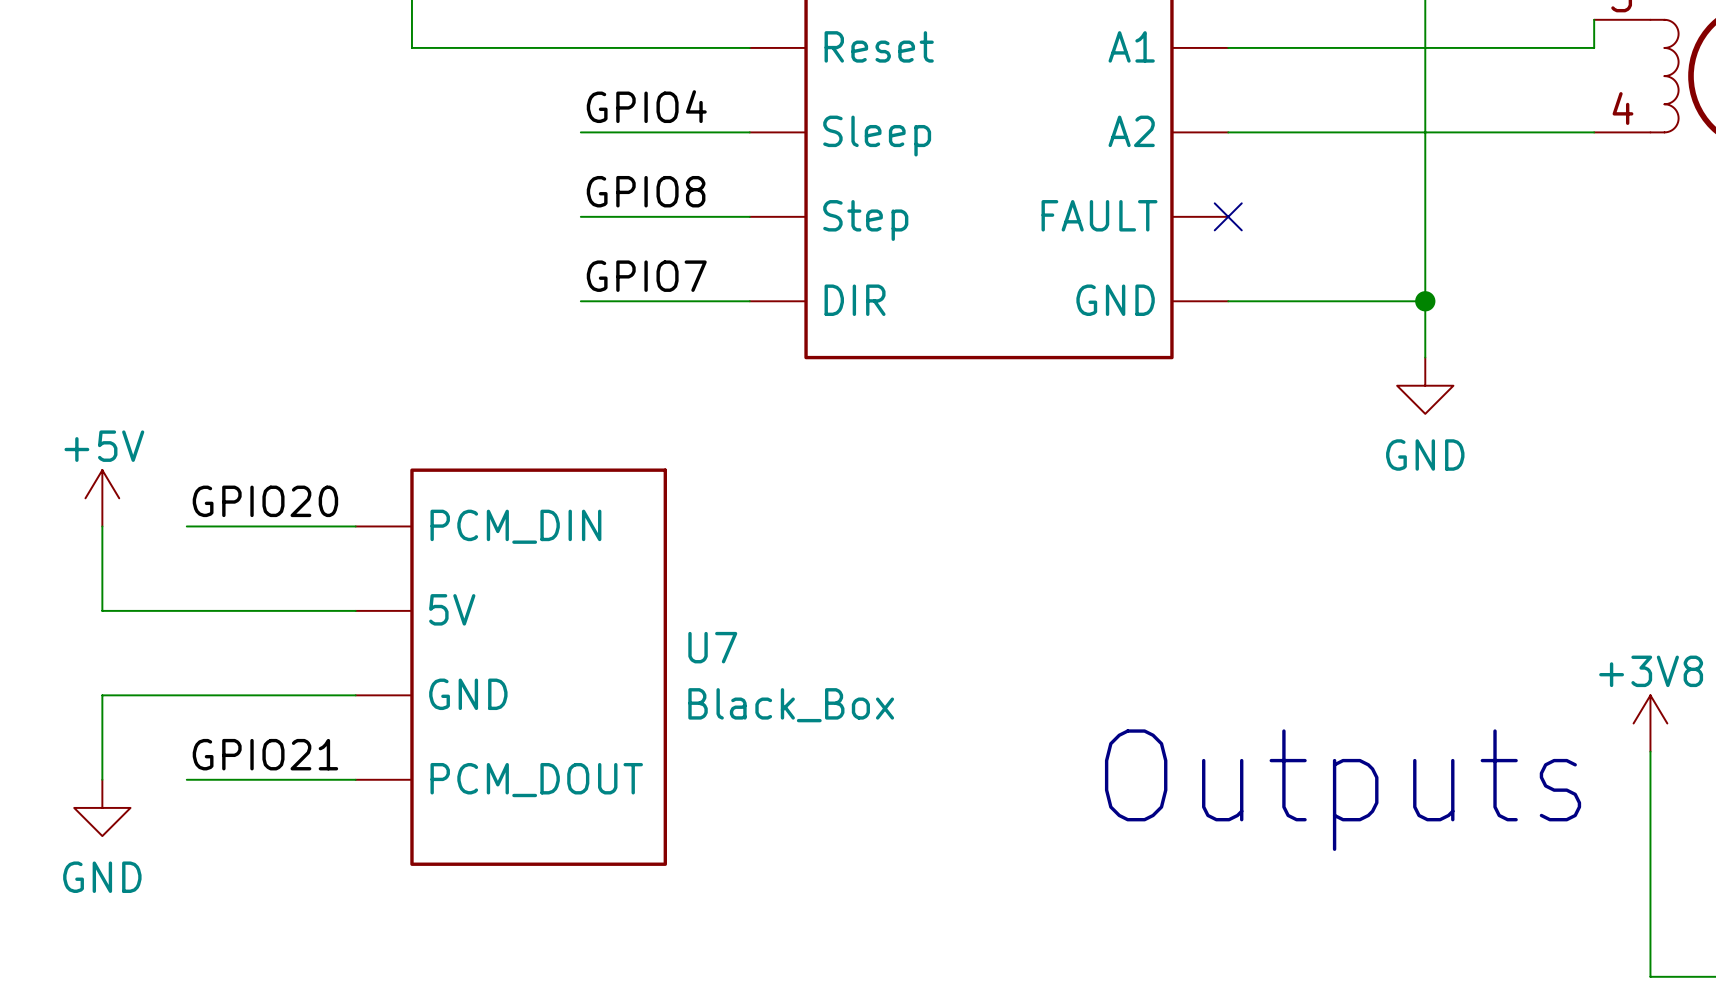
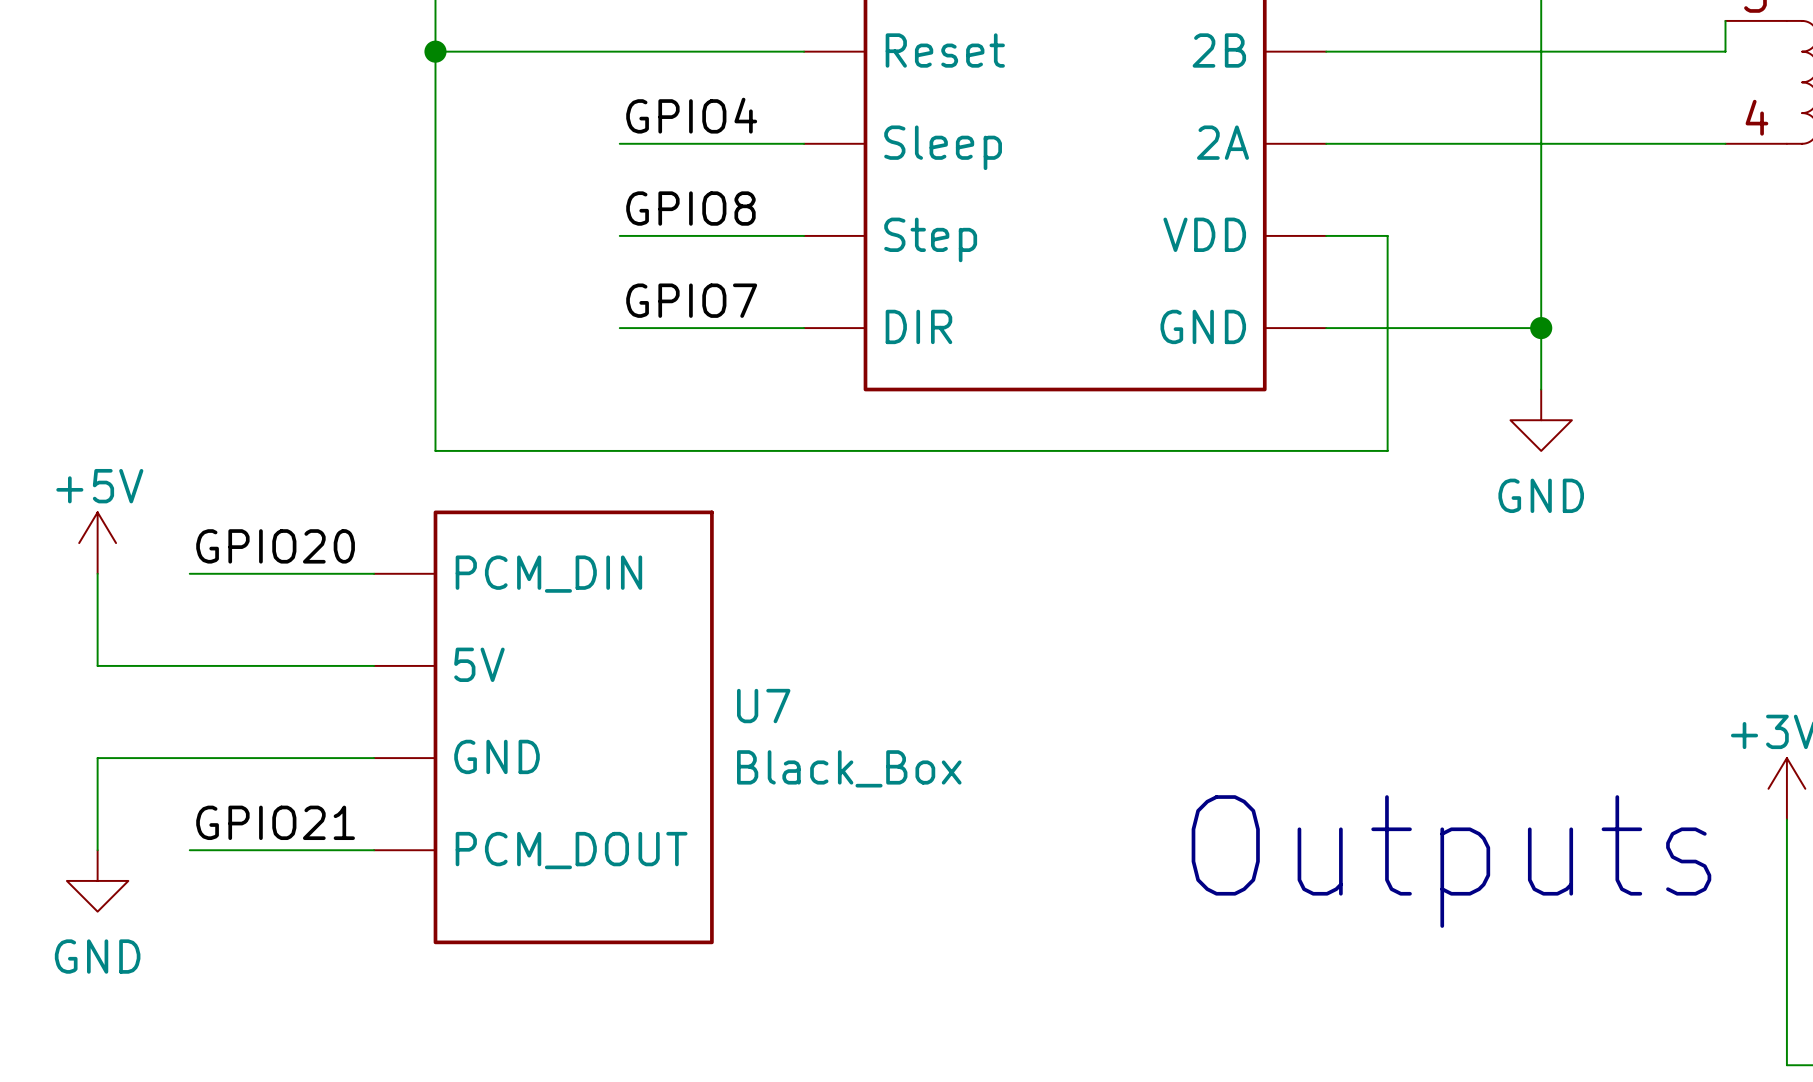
part pin name: A1 (1131, 46) -> 2B (1219, 50)
wire: none -> (435, 51) (435, 450) (1387, 450) (1387, 235) (1326, 235)
junction: none -> (435, 51)
part pin name: A2 (1131, 131) -> 2A (1223, 142)
part pin name: FAULT (1099, 215) -> VDD (1204, 234)
no-connect mark: (1228, 216) -> none

